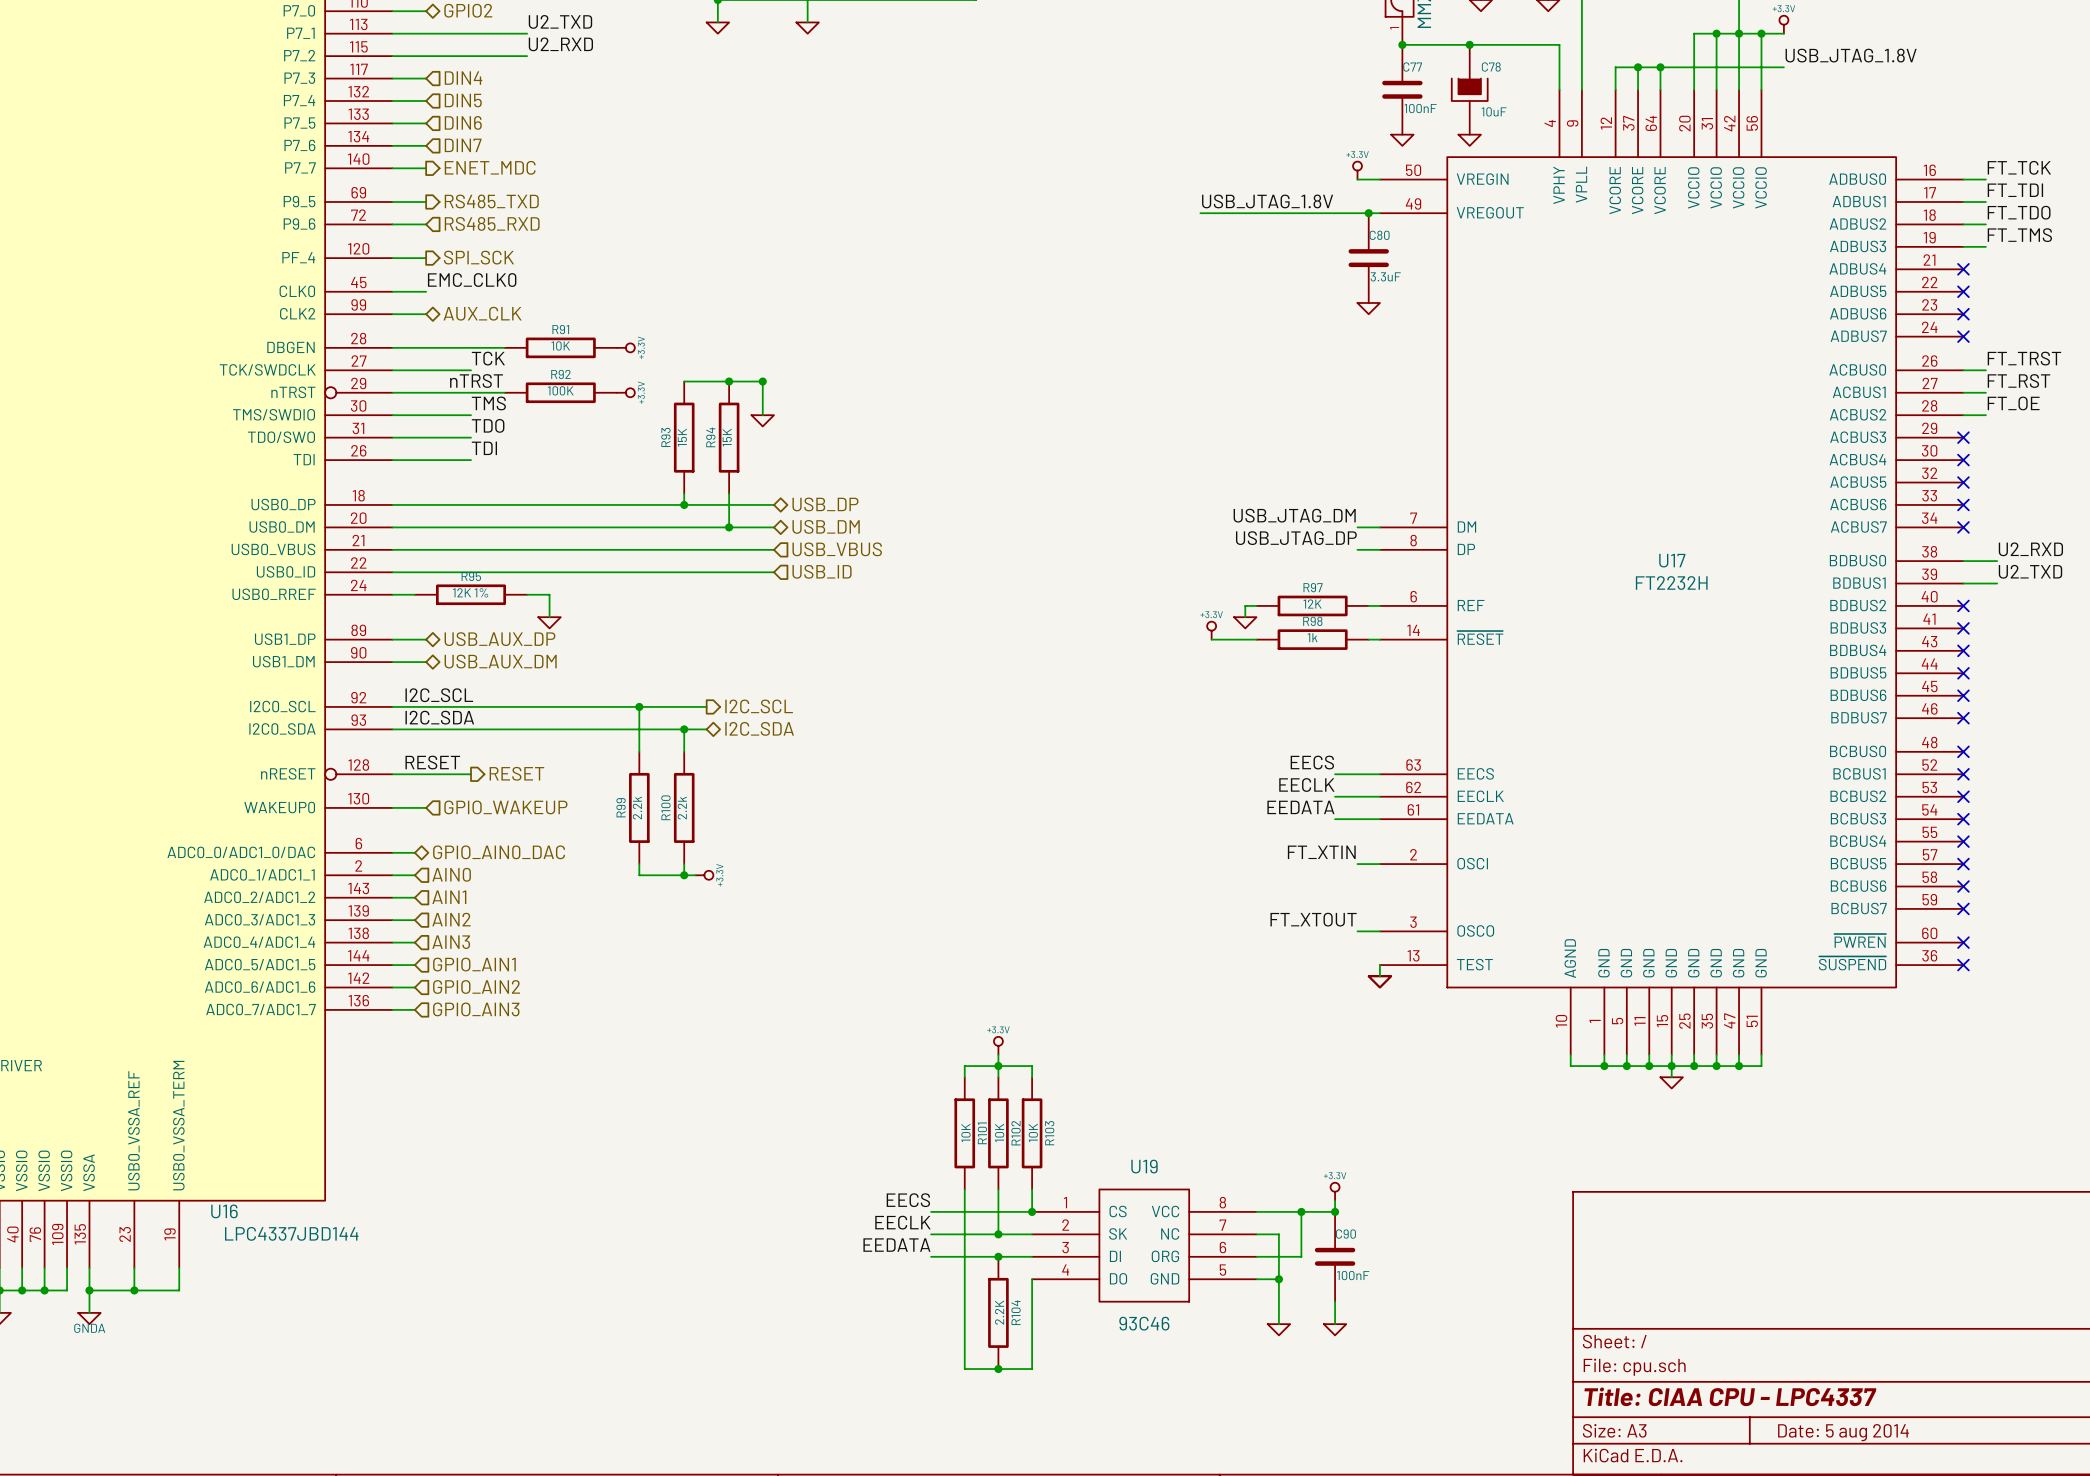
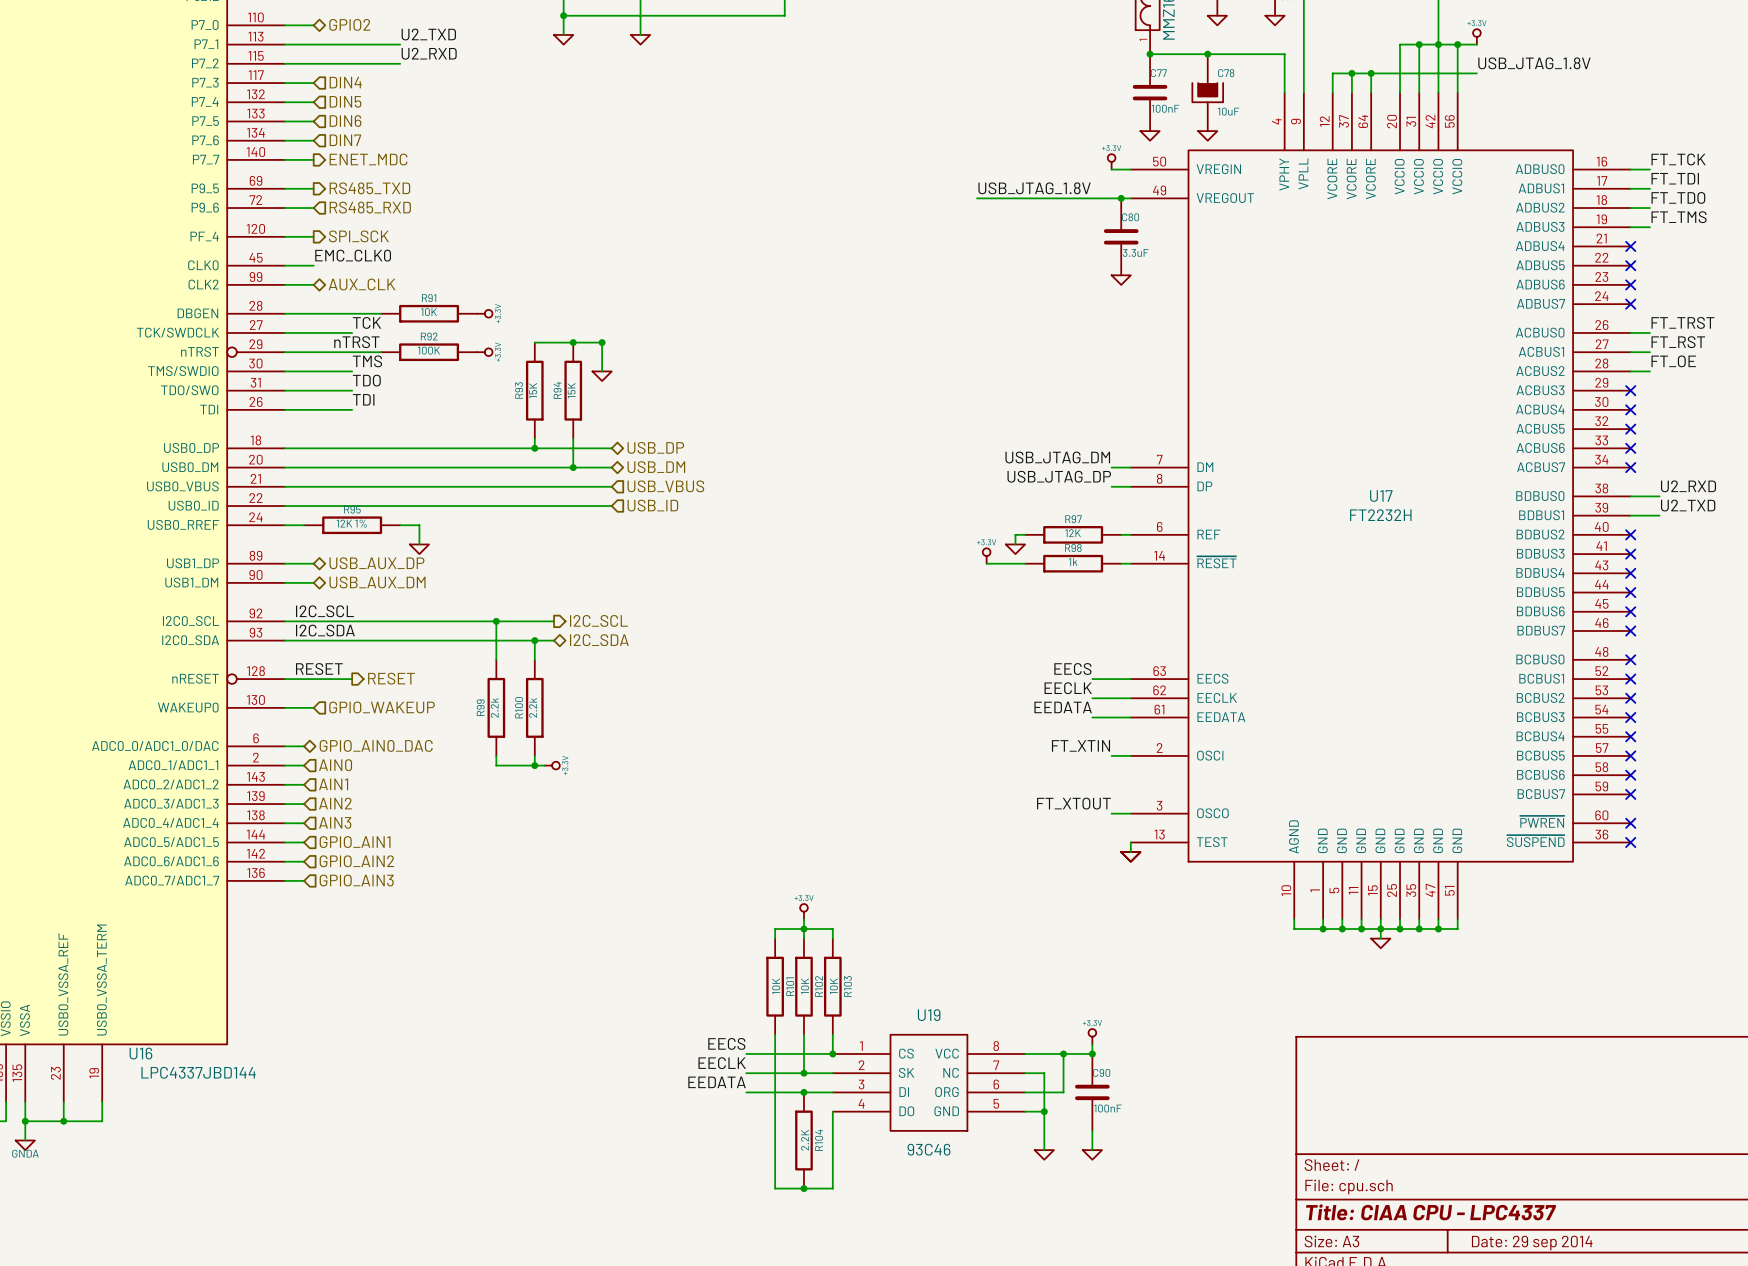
title block: Date: 5 aug 2014 (1843, 1432) -> Date: 29 sep 2014 (1532, 1243)

